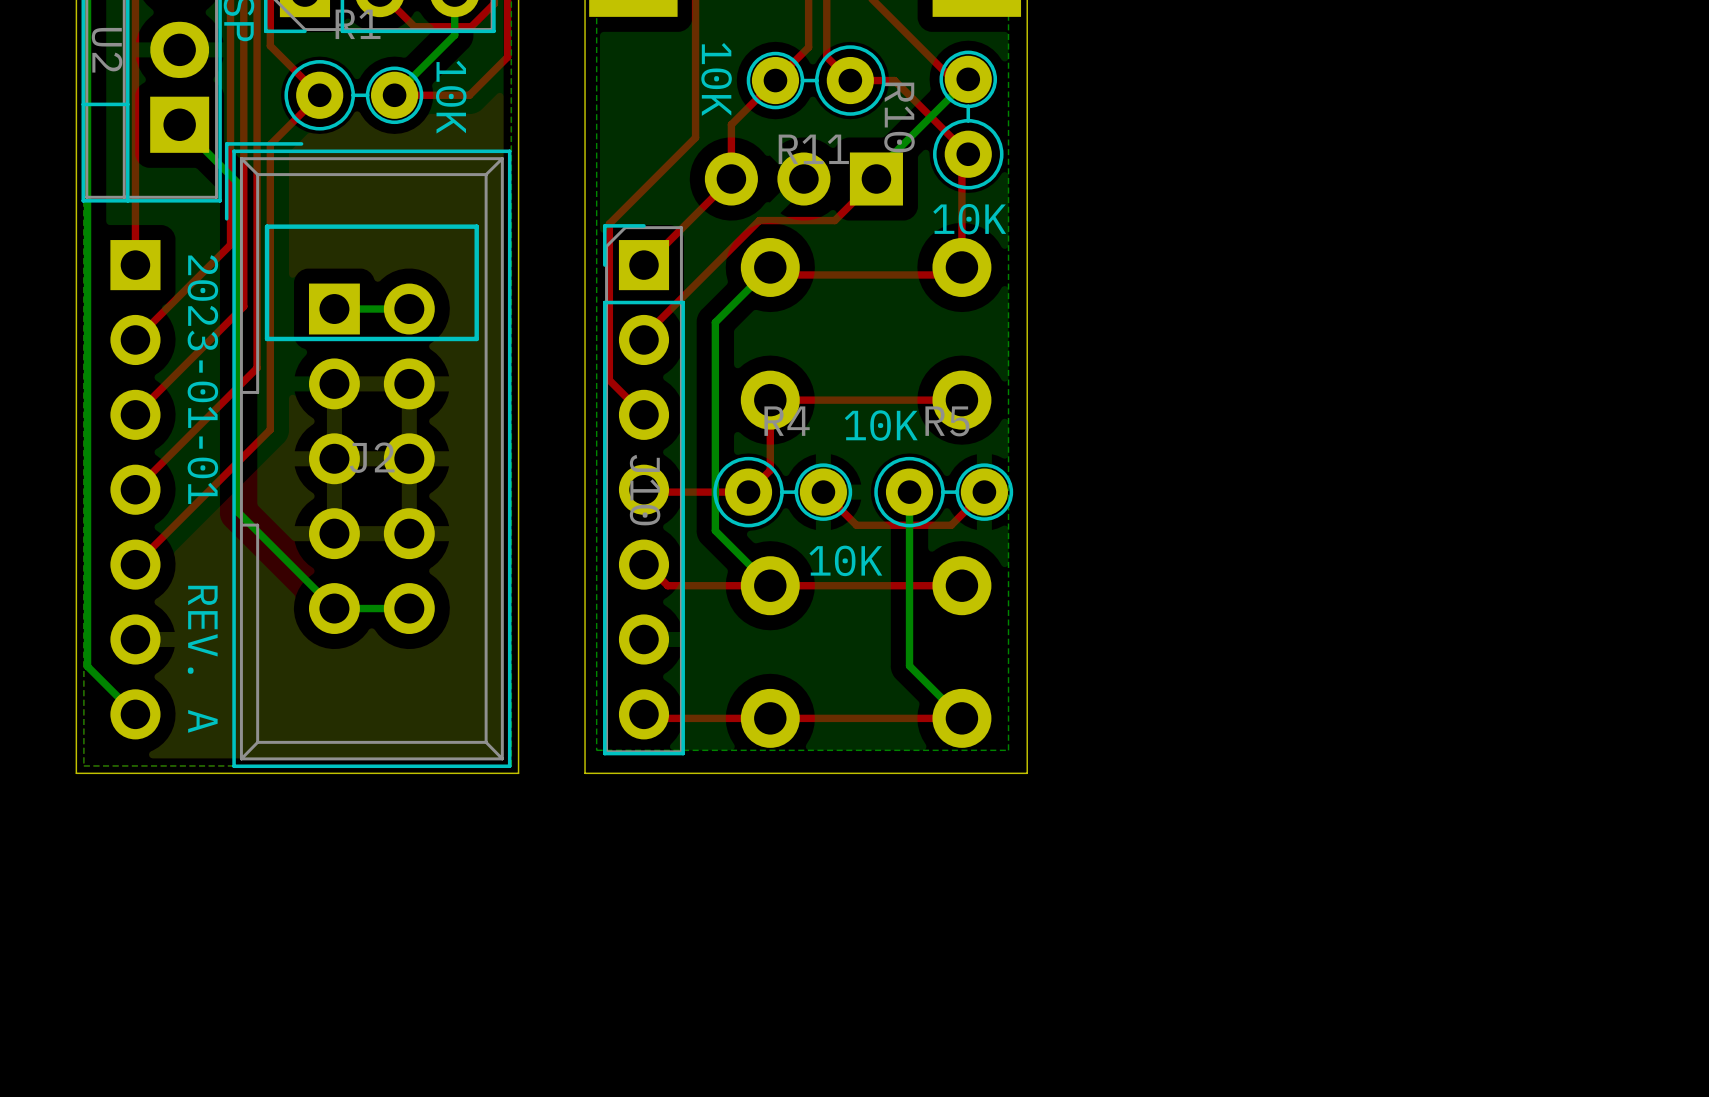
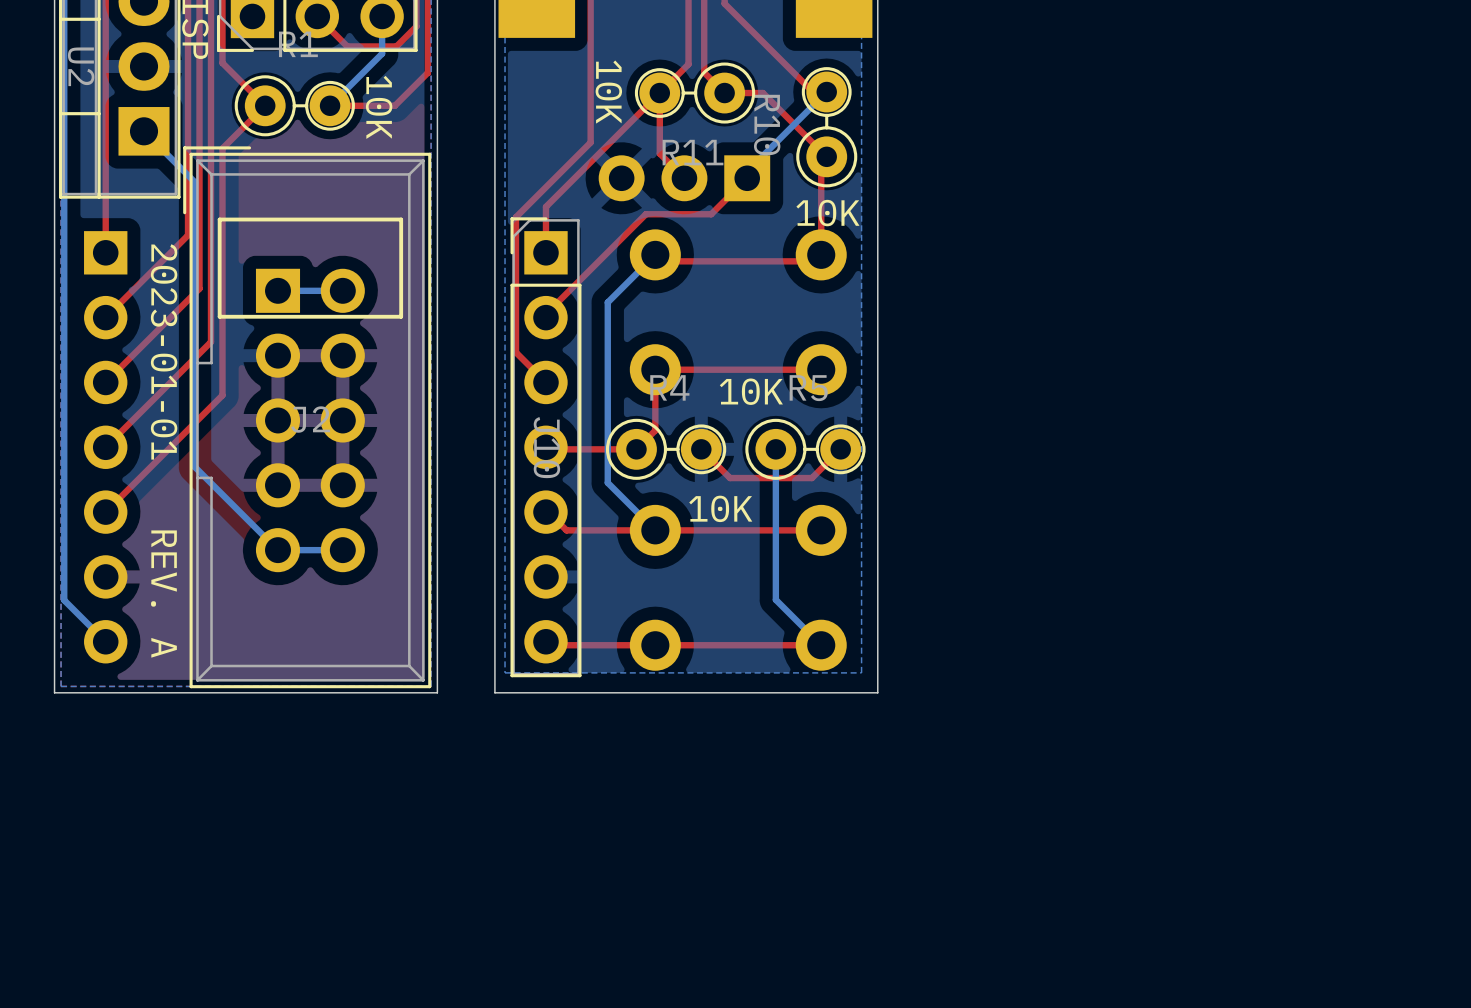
top track: none -> (659, 93) (659, 153) (684, 178)
top track: (731, 124) (731, 179) (643, 265) -> (621, 131) (545, 206) (545, 252)

